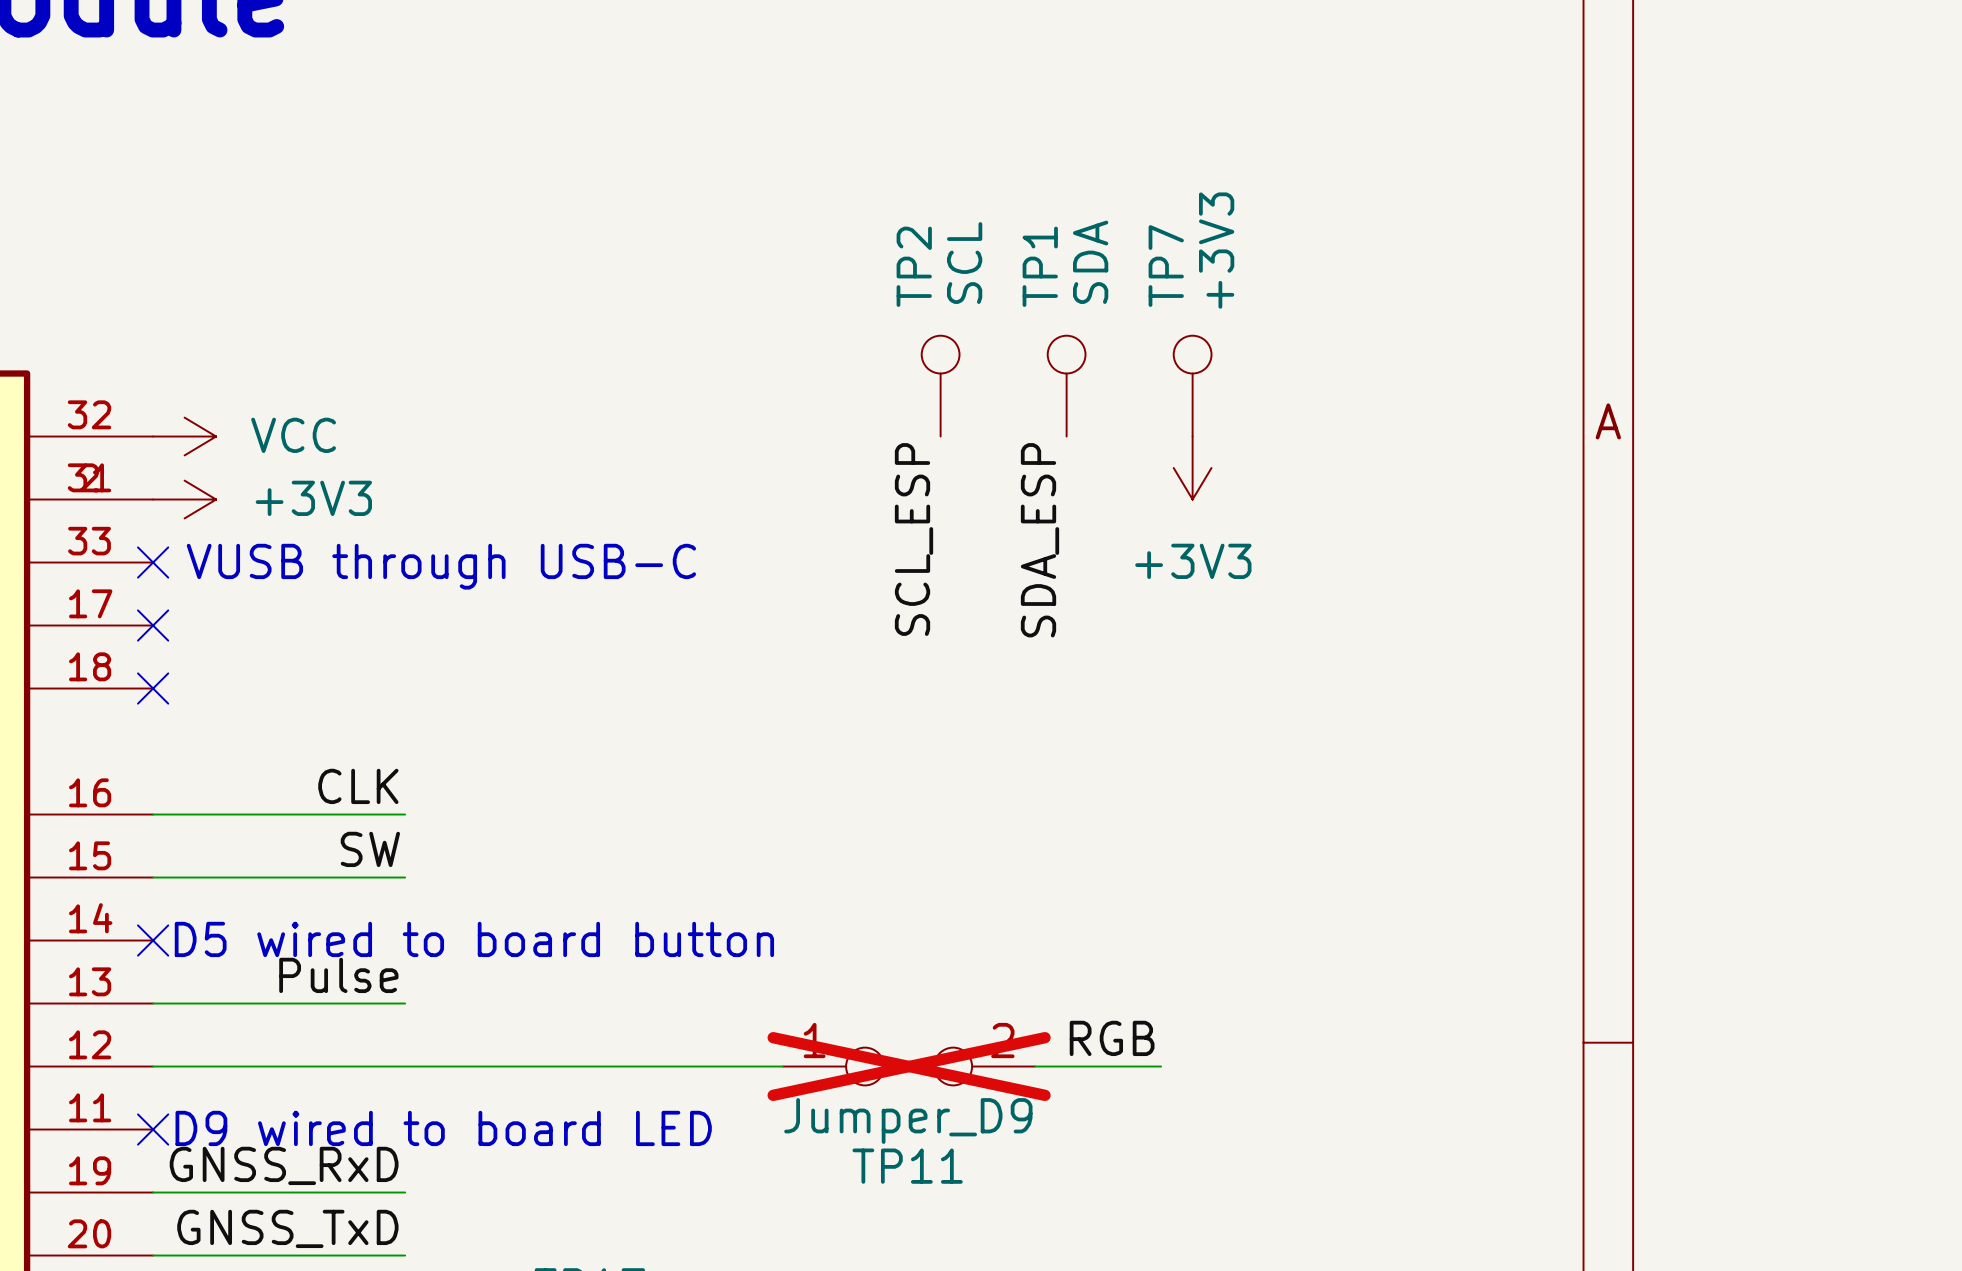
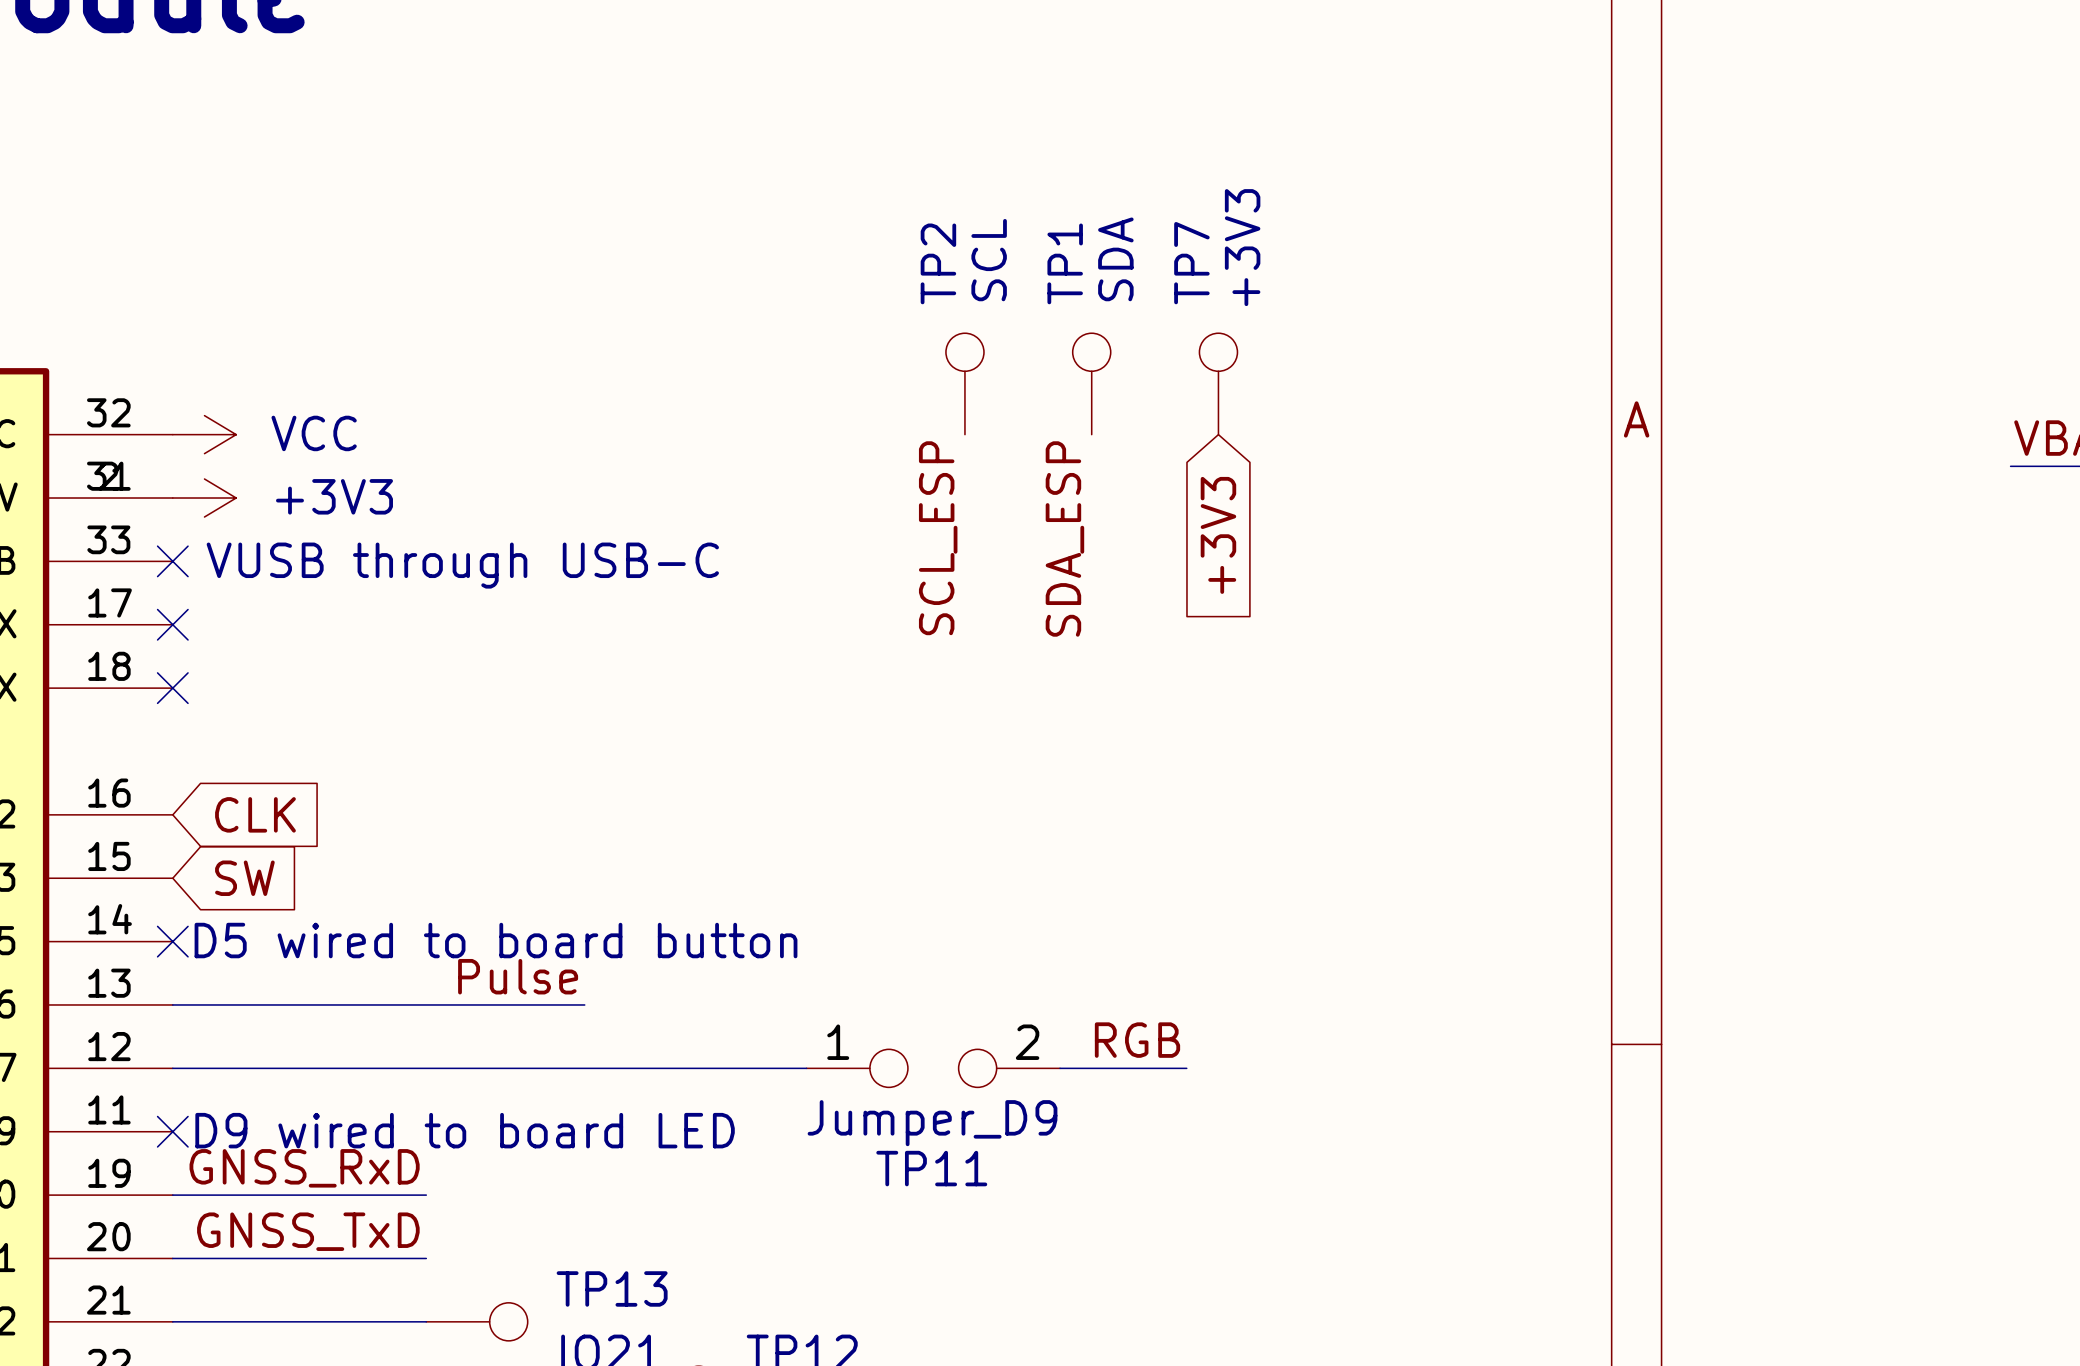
power symbol: +3V3 (1192, 468) -> none
global label: none -> +3V3 (1218, 535)
label: CLK (358, 786) -> none
wire: (153, 814) (405, 814) -> none
global label: none -> CLK (255, 814)
label: SW (370, 849) -> none
wire: (153, 877) (405, 877) -> none
global label: none -> SW (244, 878)
label position: Pulse (338, 975) -> Pulse (518, 976)
wire: none -> (426, 1004) (584, 1004)
TP11 do-not-place cross: (909, 1066) -> none

